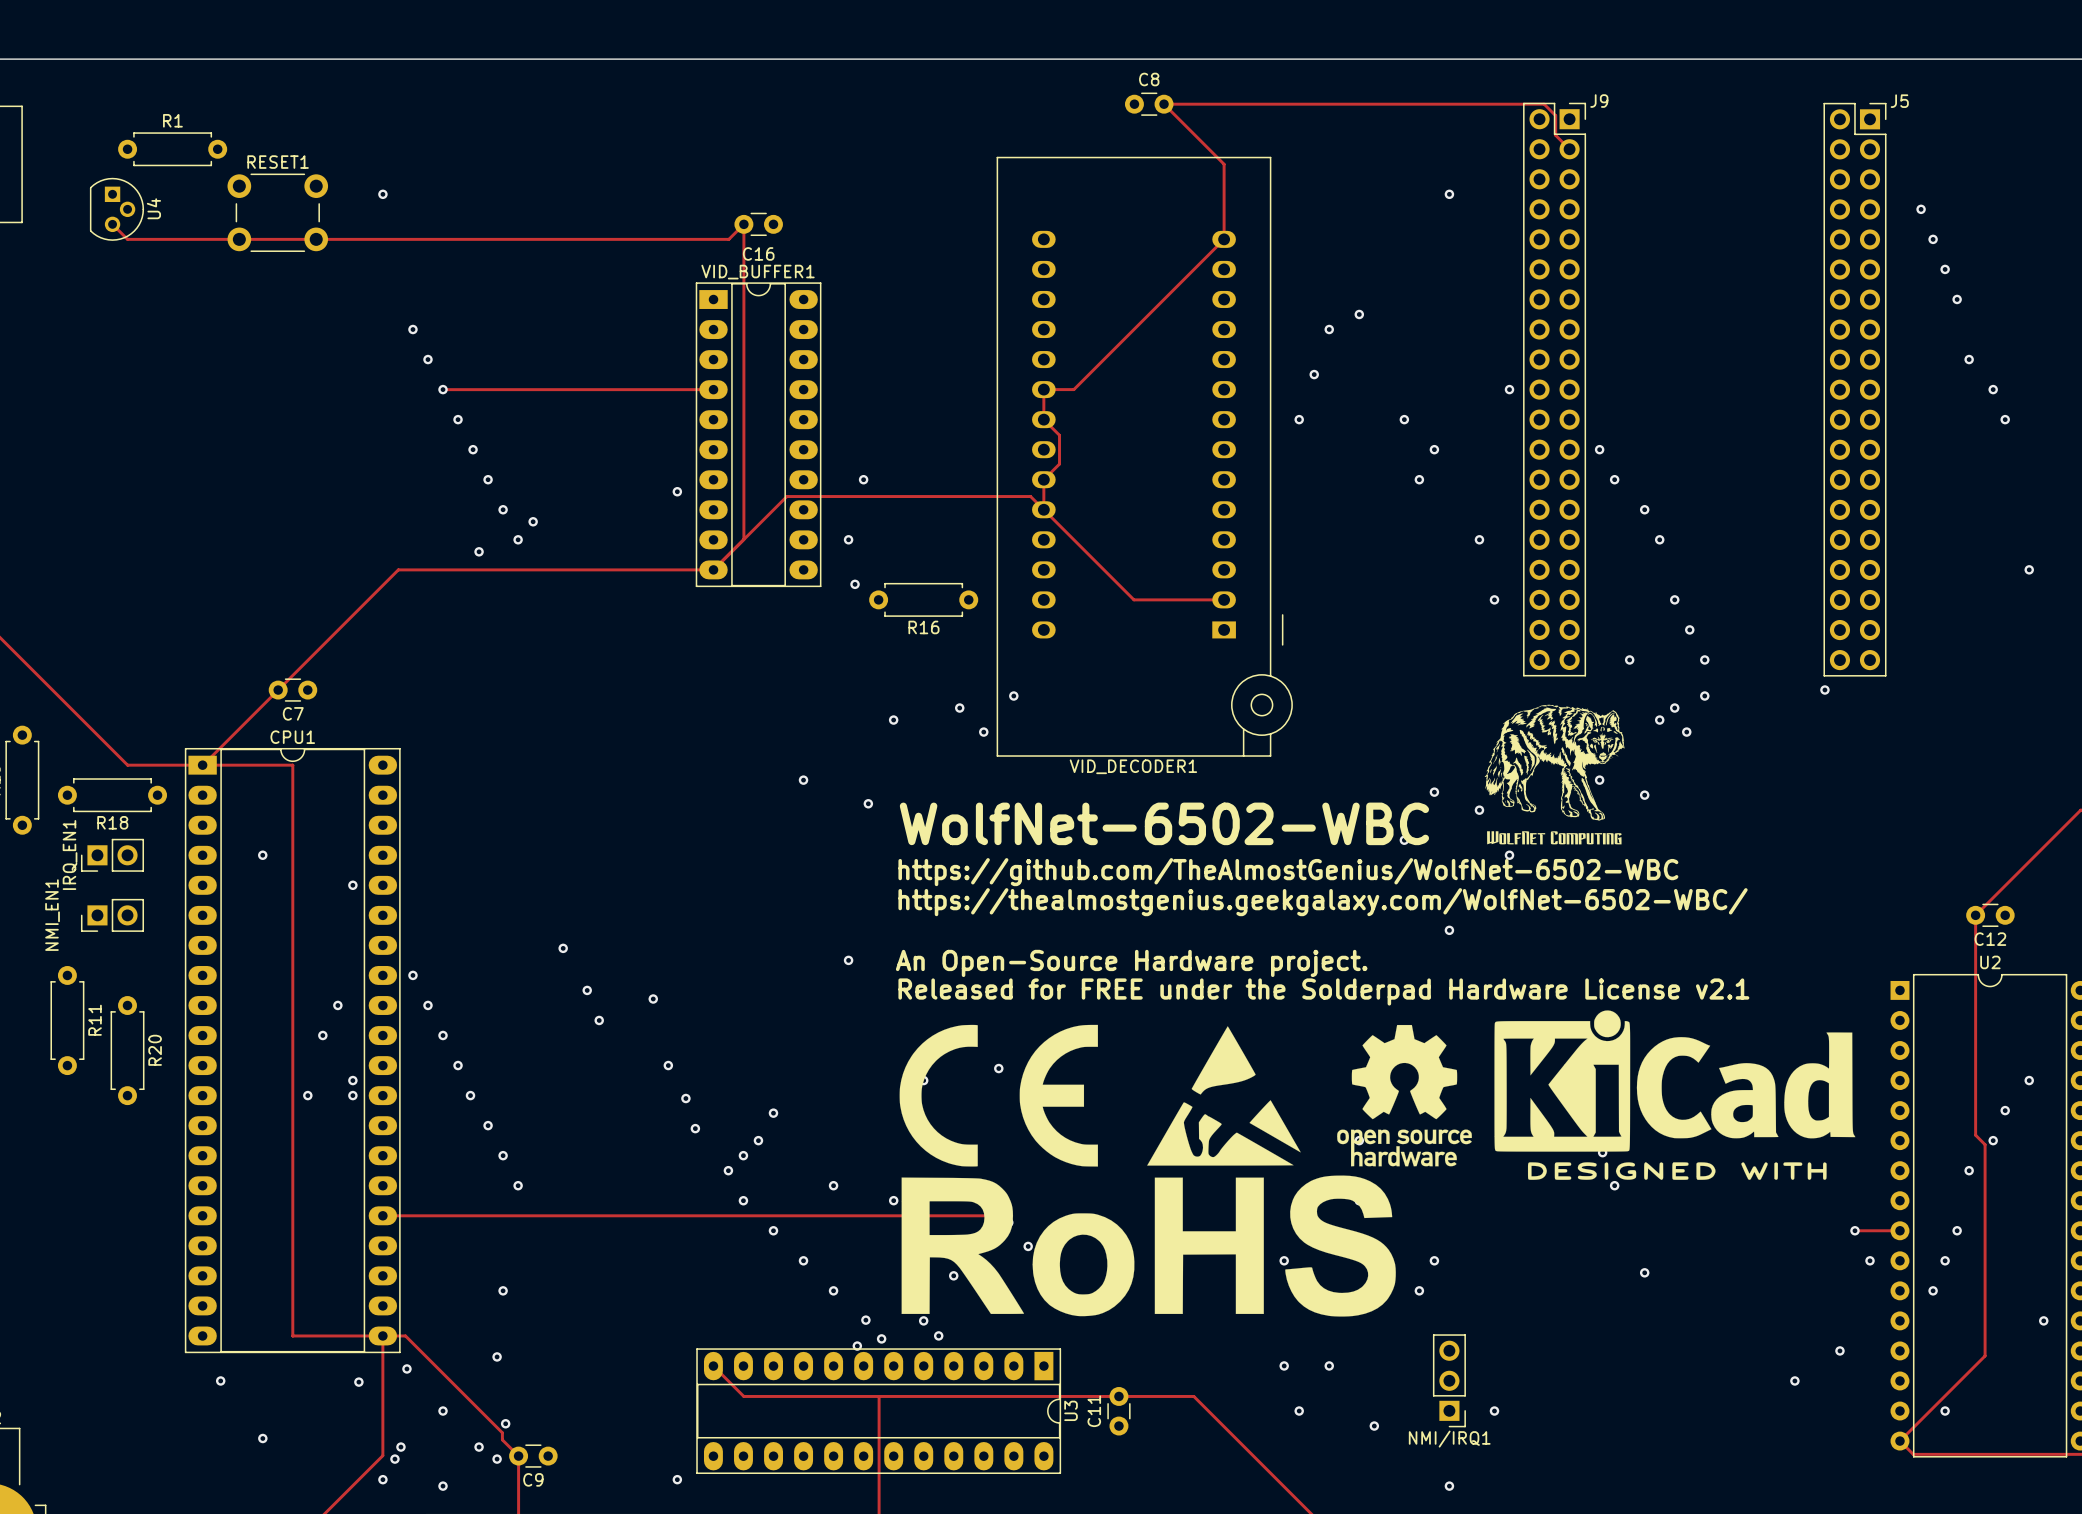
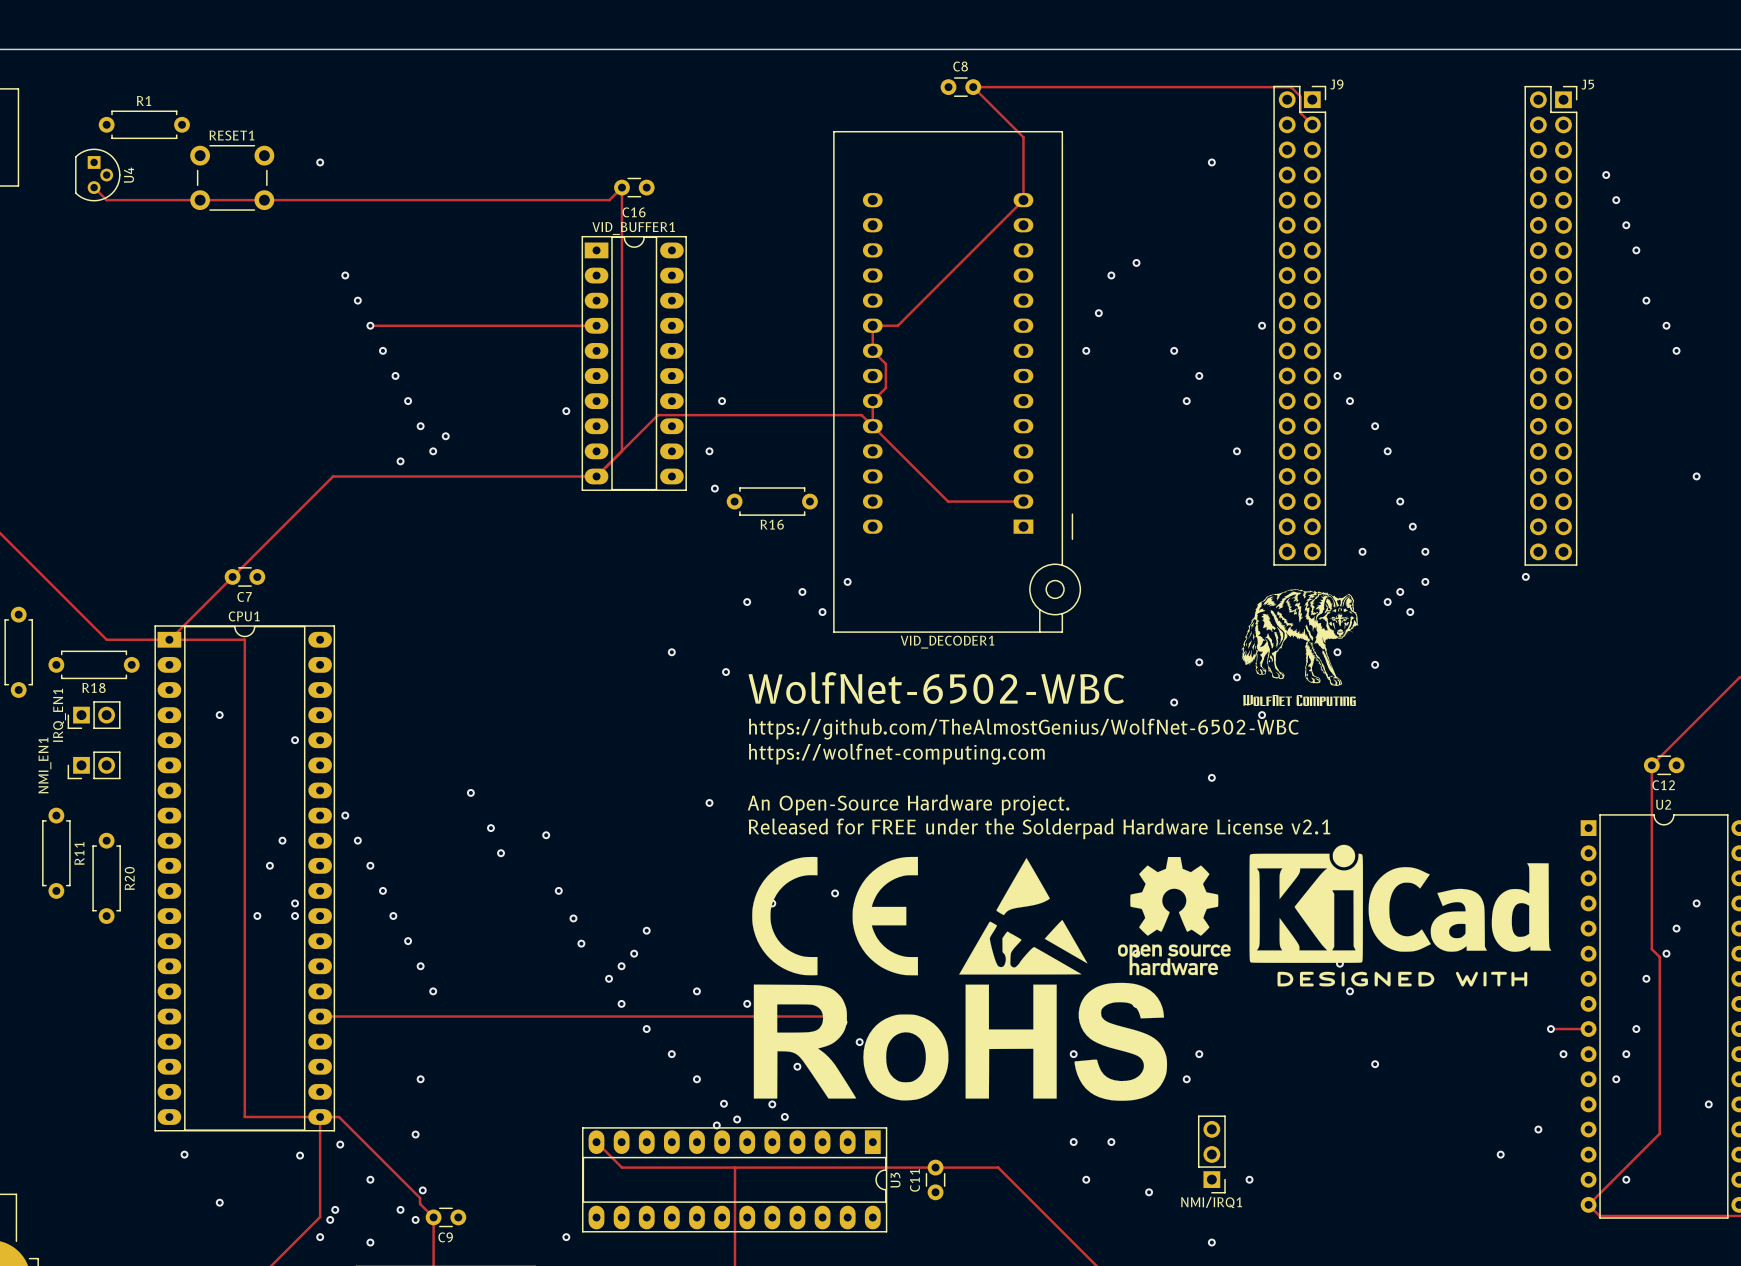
text: https://thealmostgenius.geekgalaxy.com/WolfNet-6502-WBC/ (1323, 902) -> https://wolfnet-computing.com (896, 754)

